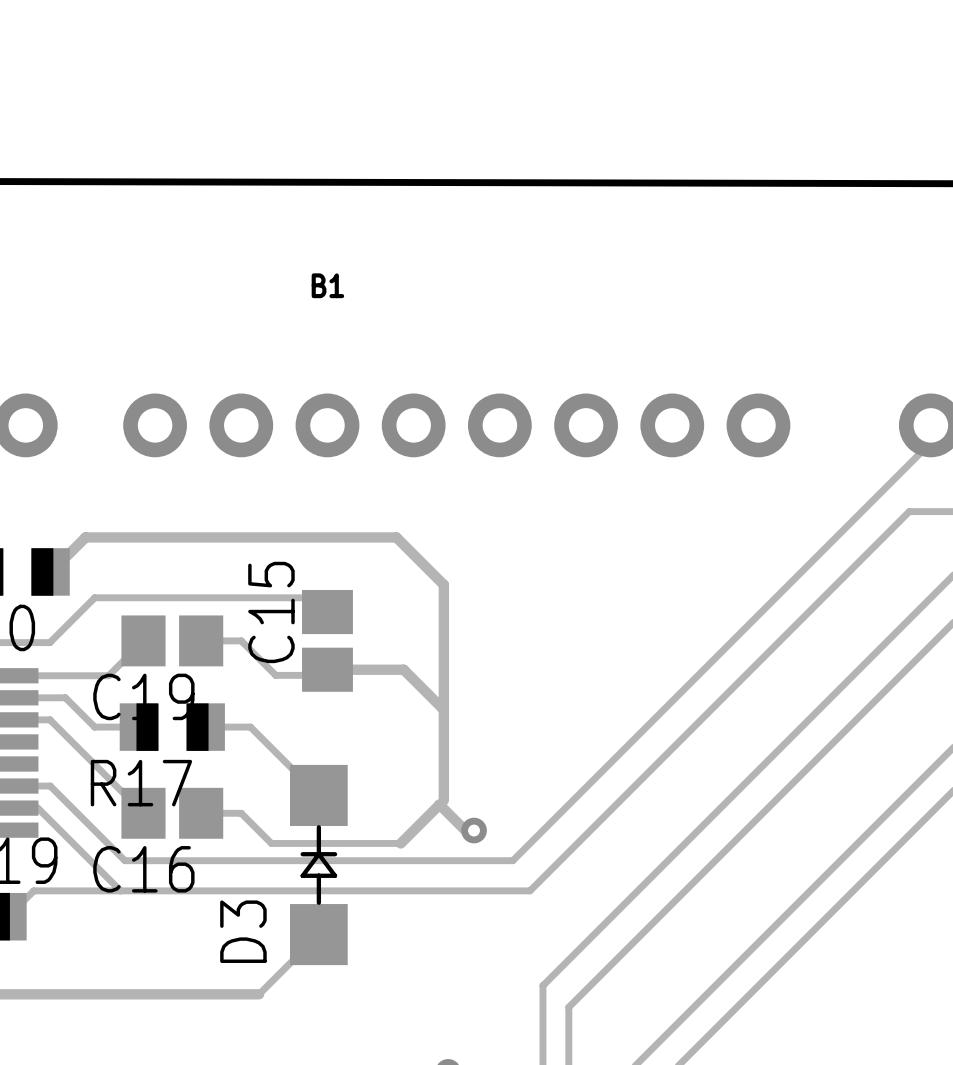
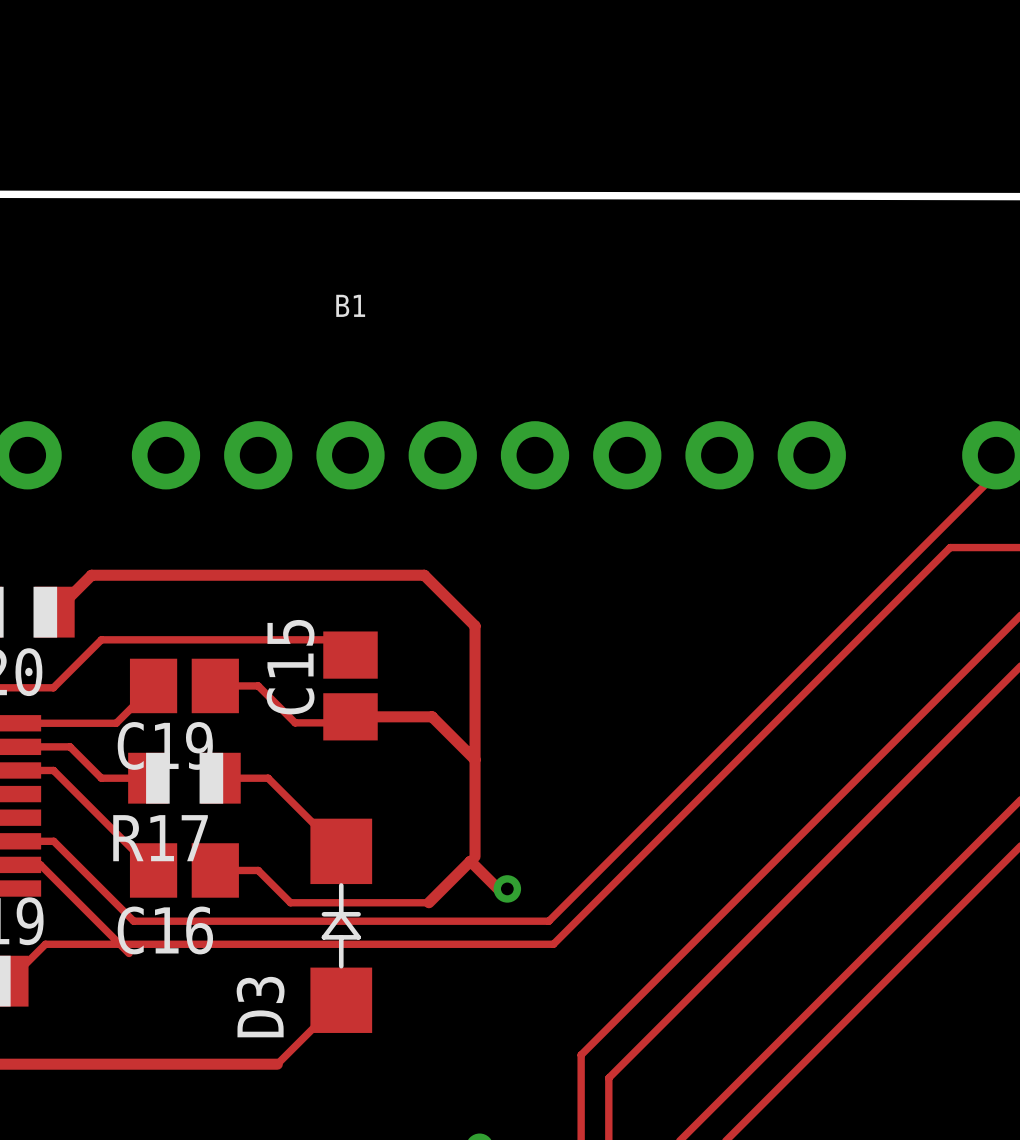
track: (909, 511) (530, 890) (33, 890) -> (973, 547) (950, 547) (553, 944) (45, 944) (36, 953)

